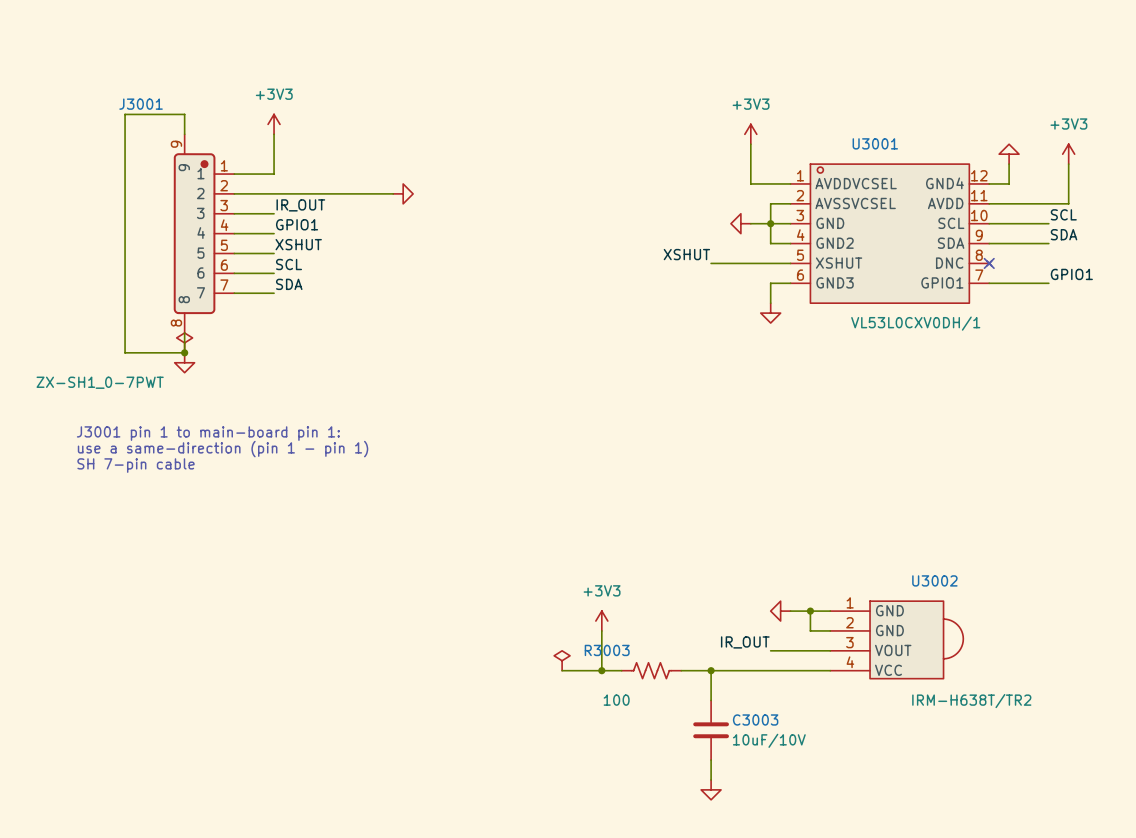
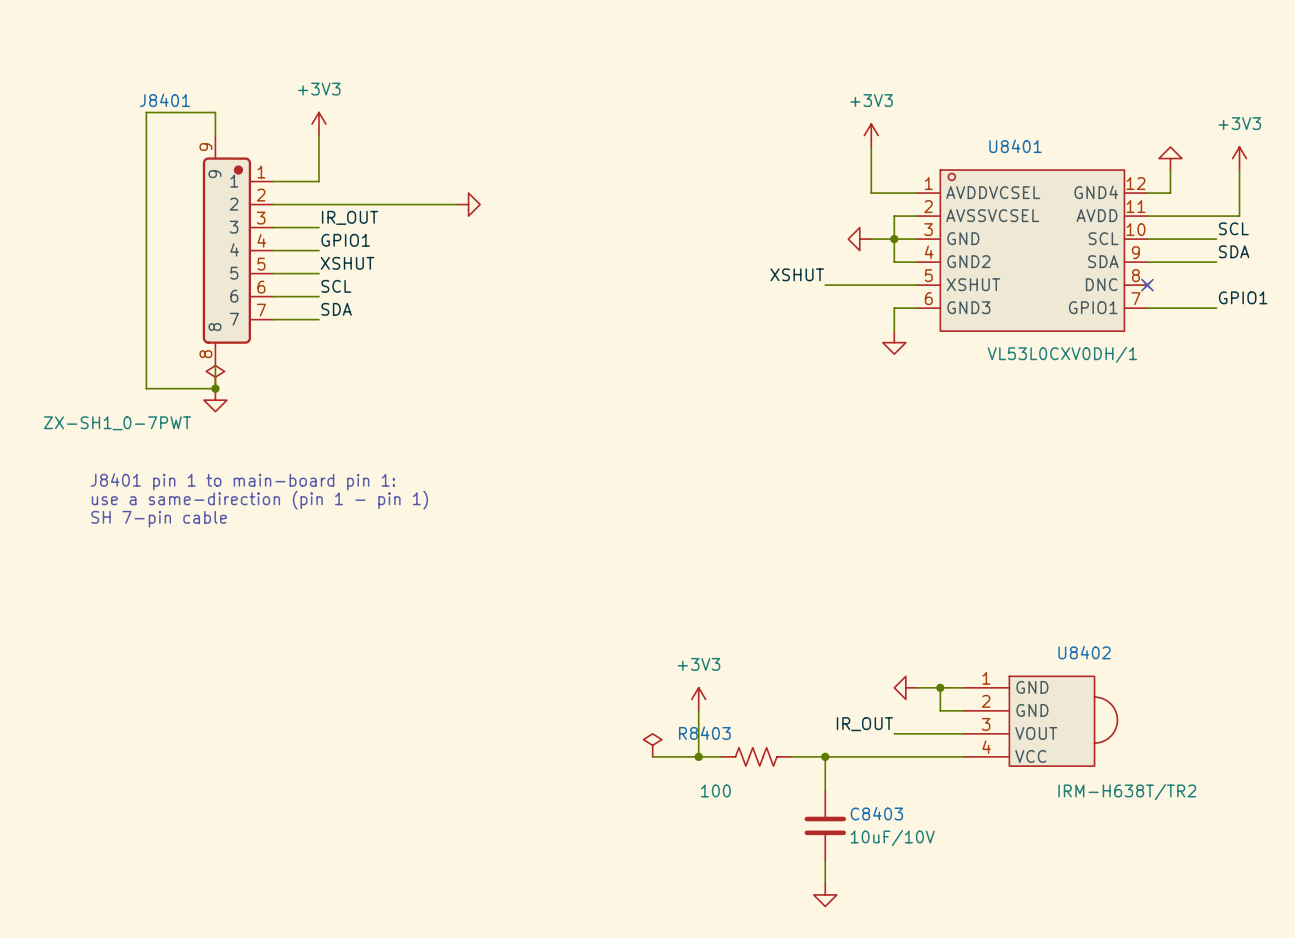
J3001 name: J3001 (141, 104) -> J8401 (164, 100)
U3001 name: U3001 (875, 143) -> U8401 (1015, 146)
text: J3001 pin 1 to main-board pin 1: (208, 433) -> J8401 pin 1 to main-board pin 1: (242, 481)
U3002 name: U3002 (934, 580) -> U8402 (1084, 652)
R3003 name: R3003 (607, 650) -> R8403 (704, 733)
C3003 name: C3003 (755, 719) -> C8403 (876, 813)

